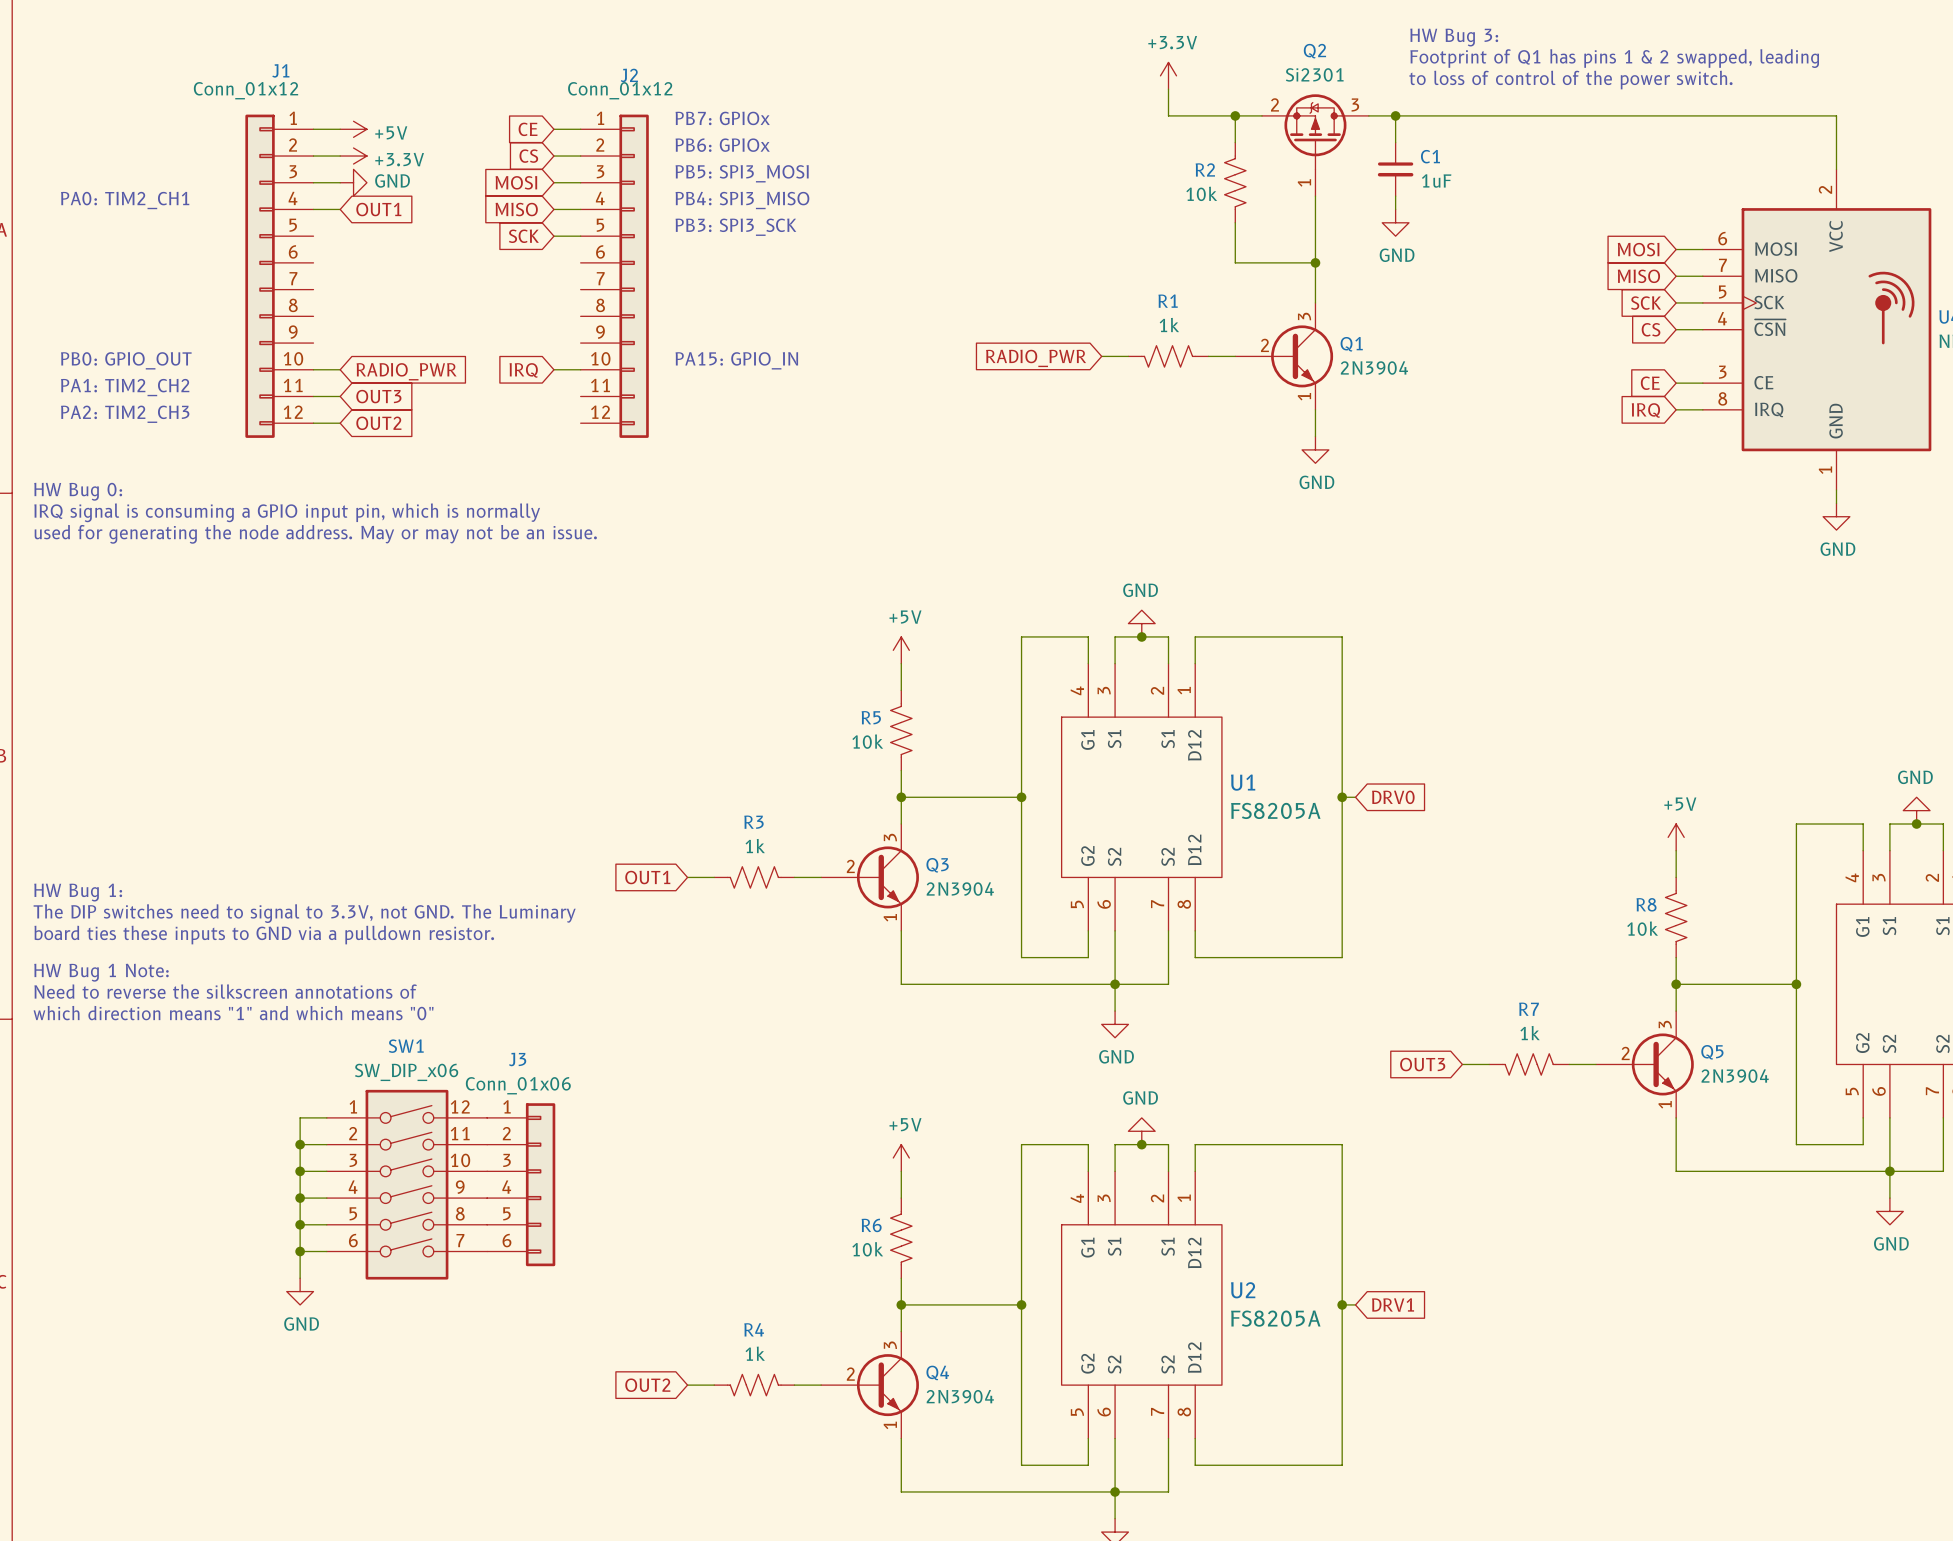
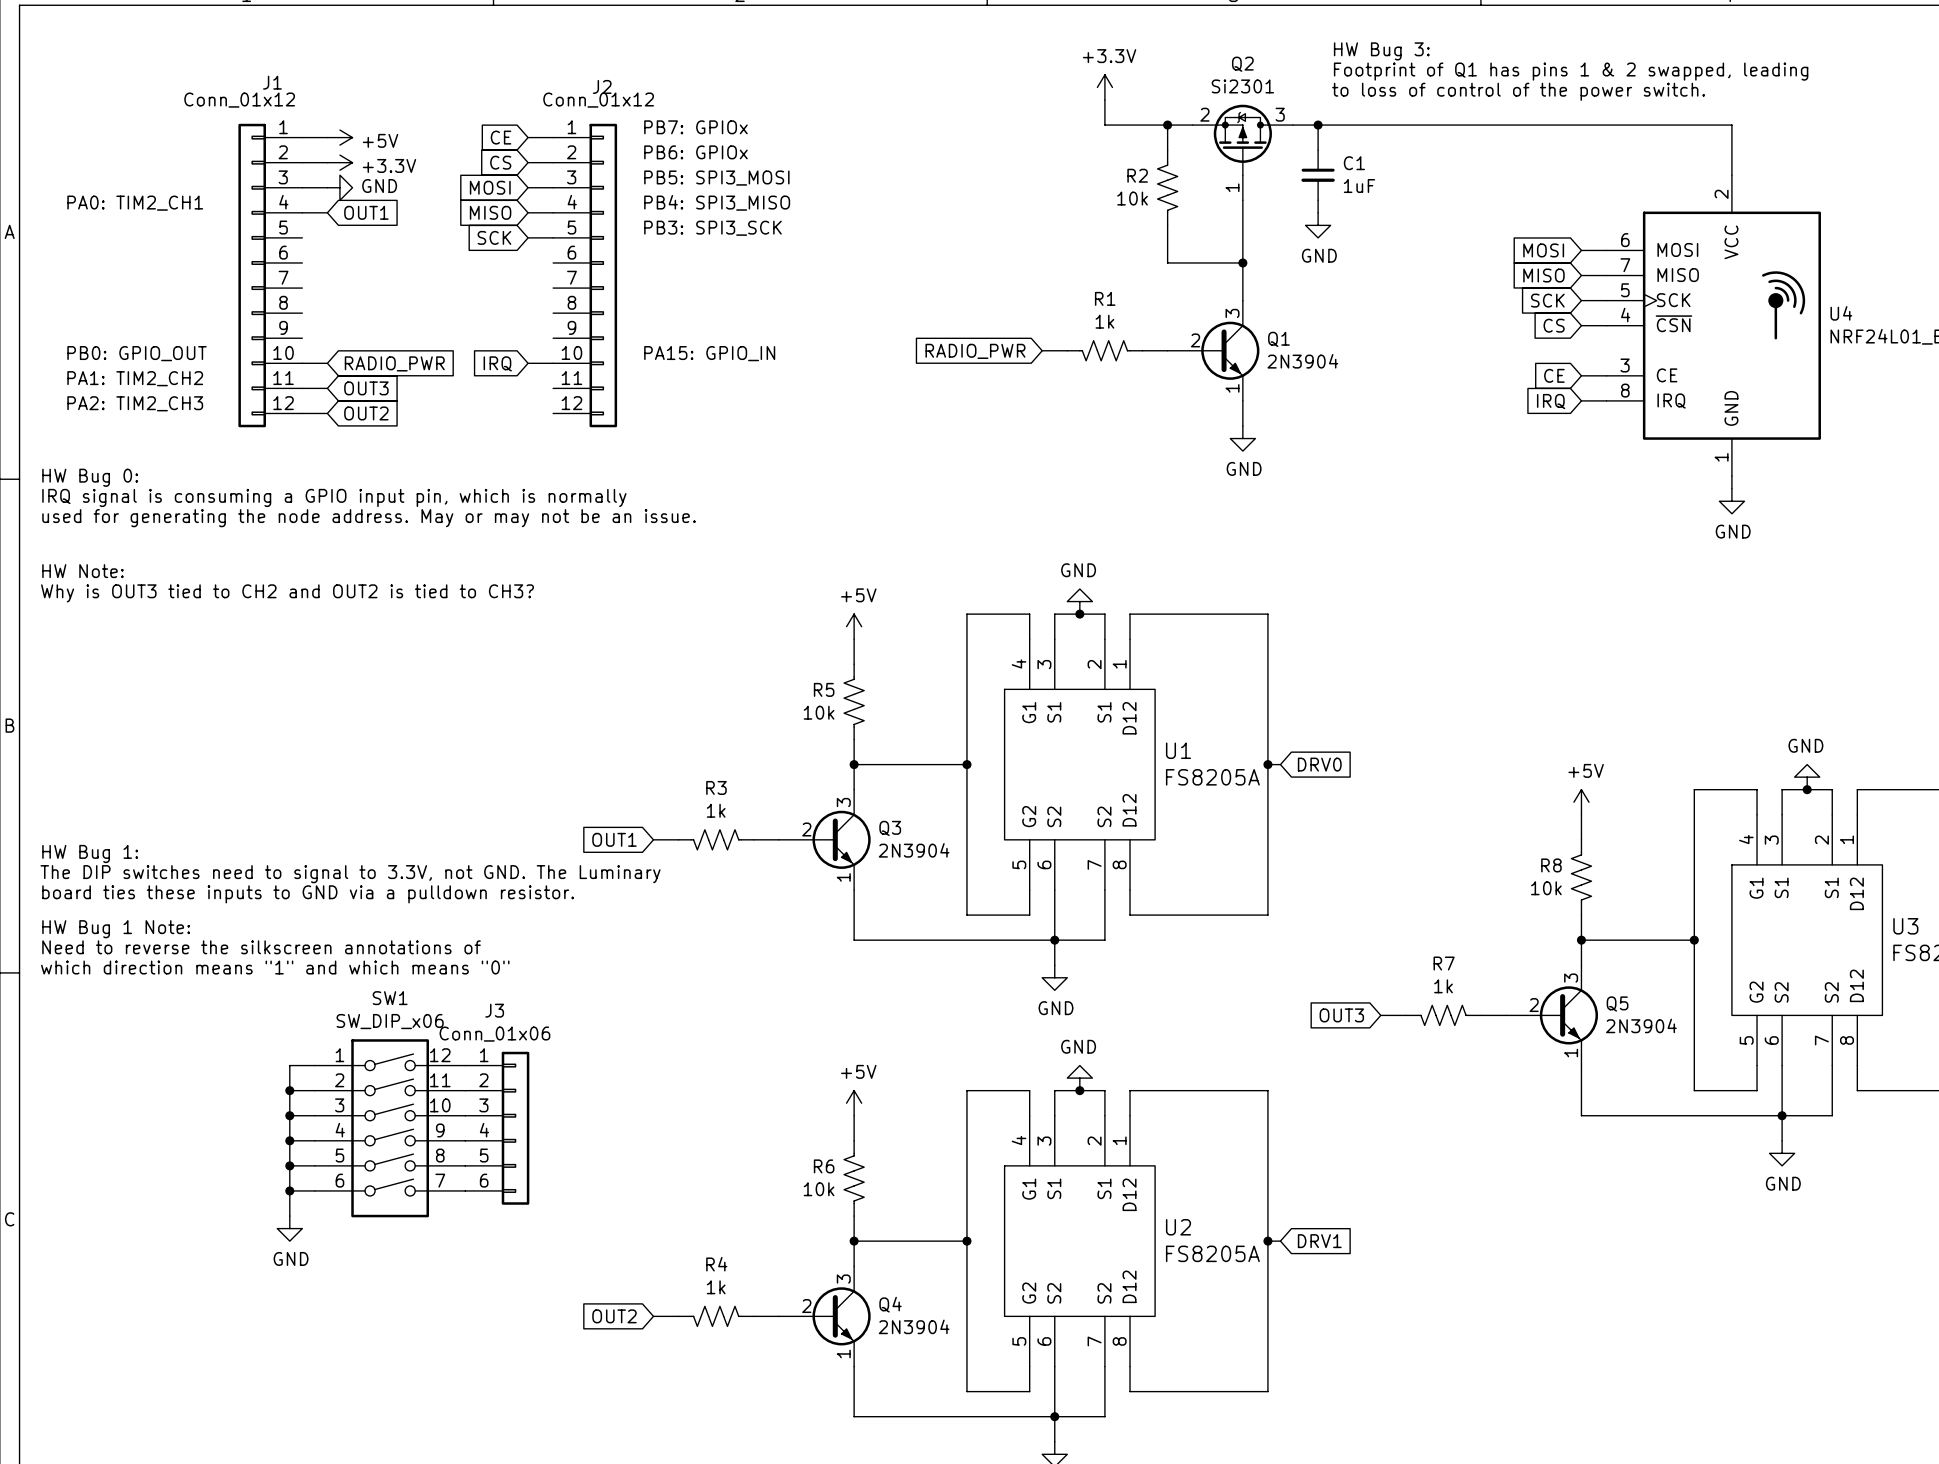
text: none -> HW Note: (82, 571)
text: none -> Why is OUT3 tied to CH2 and OUT2 is tied to CH3? (287, 593)

